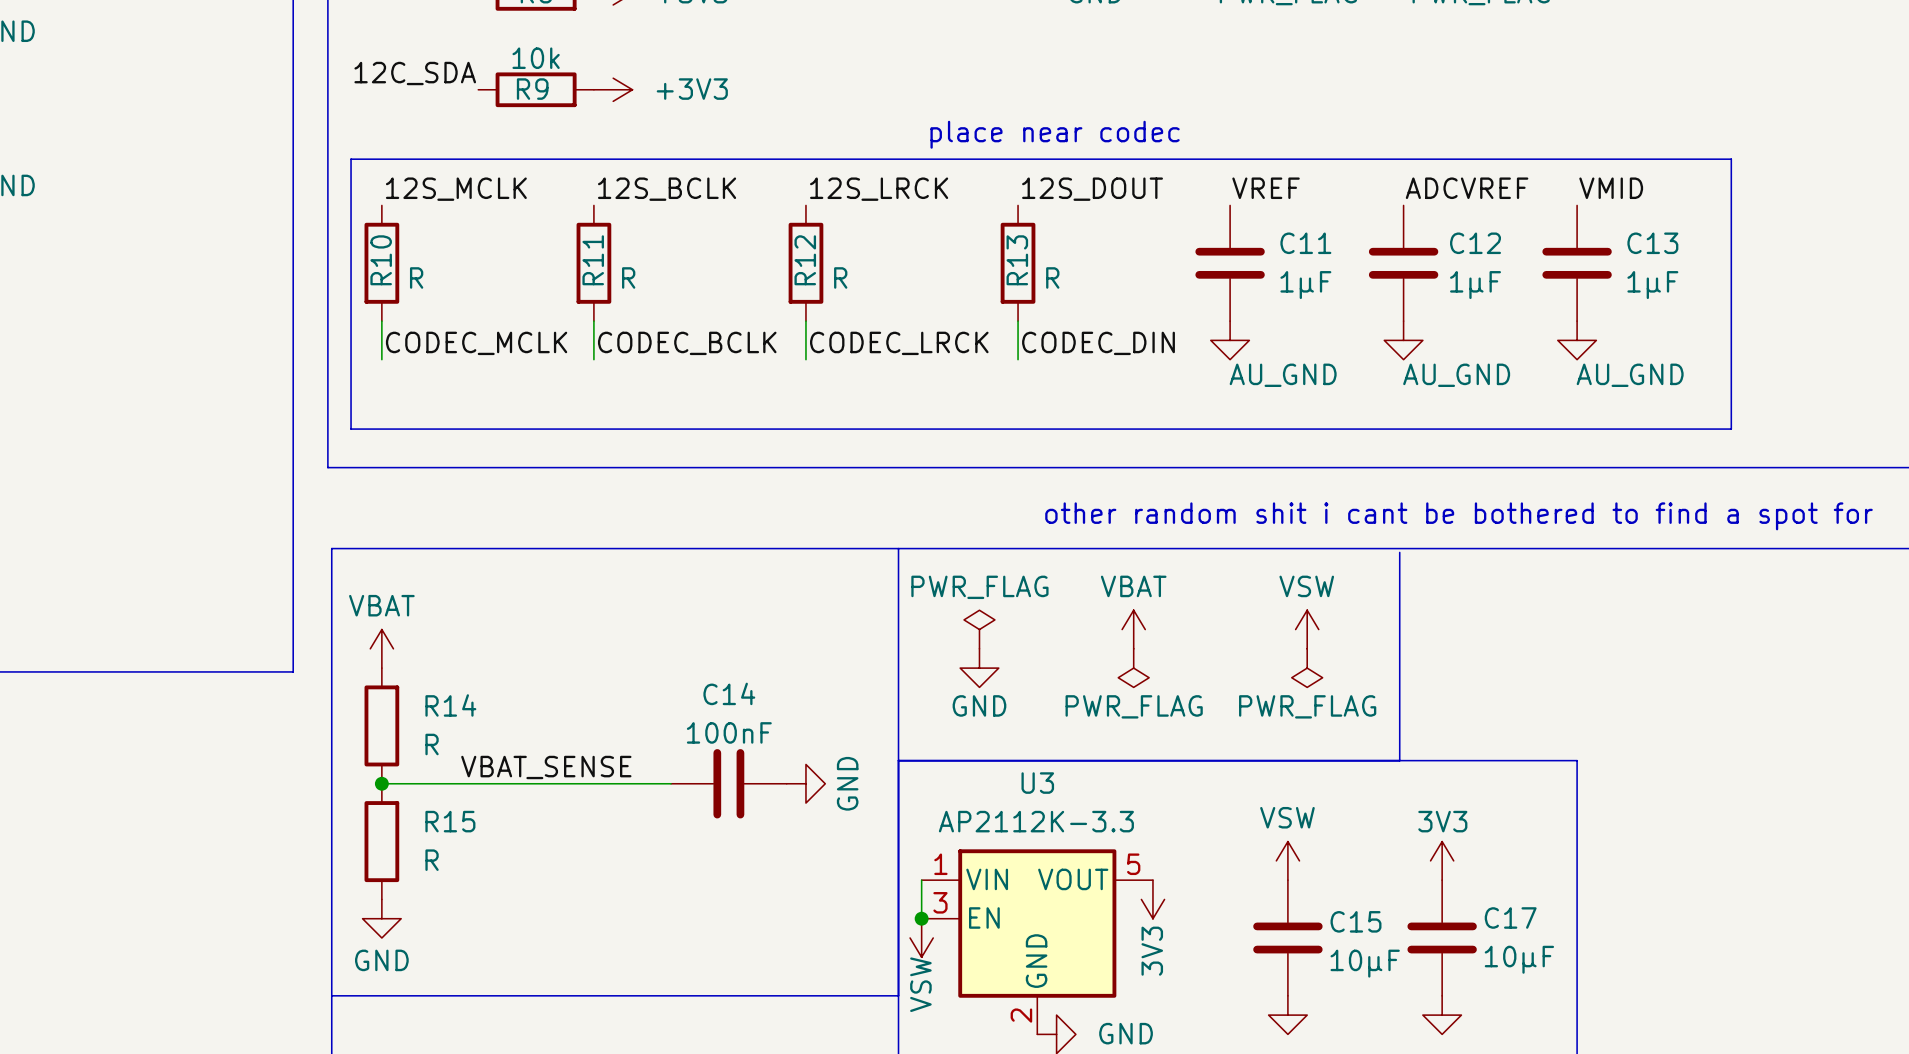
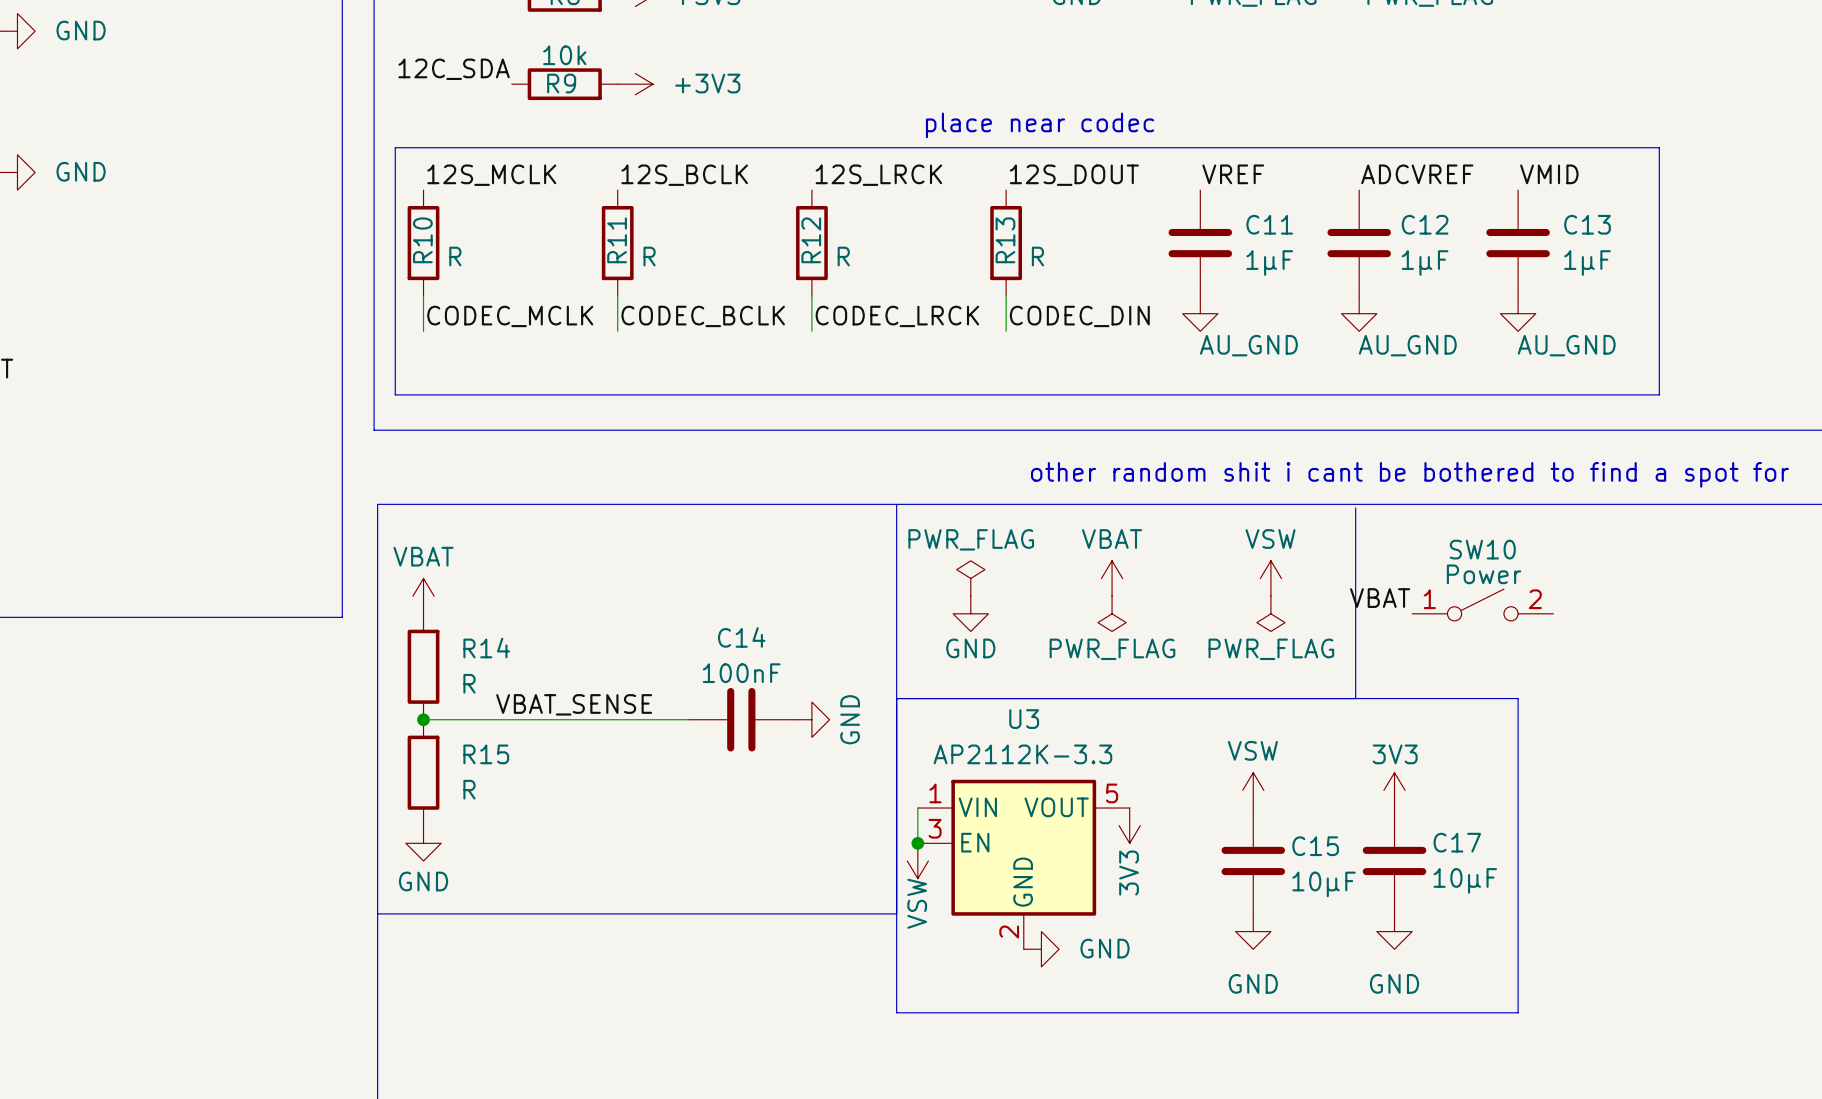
label: none -> VBAT (1380, 598)
SW10: none -> Power (1482, 604)

